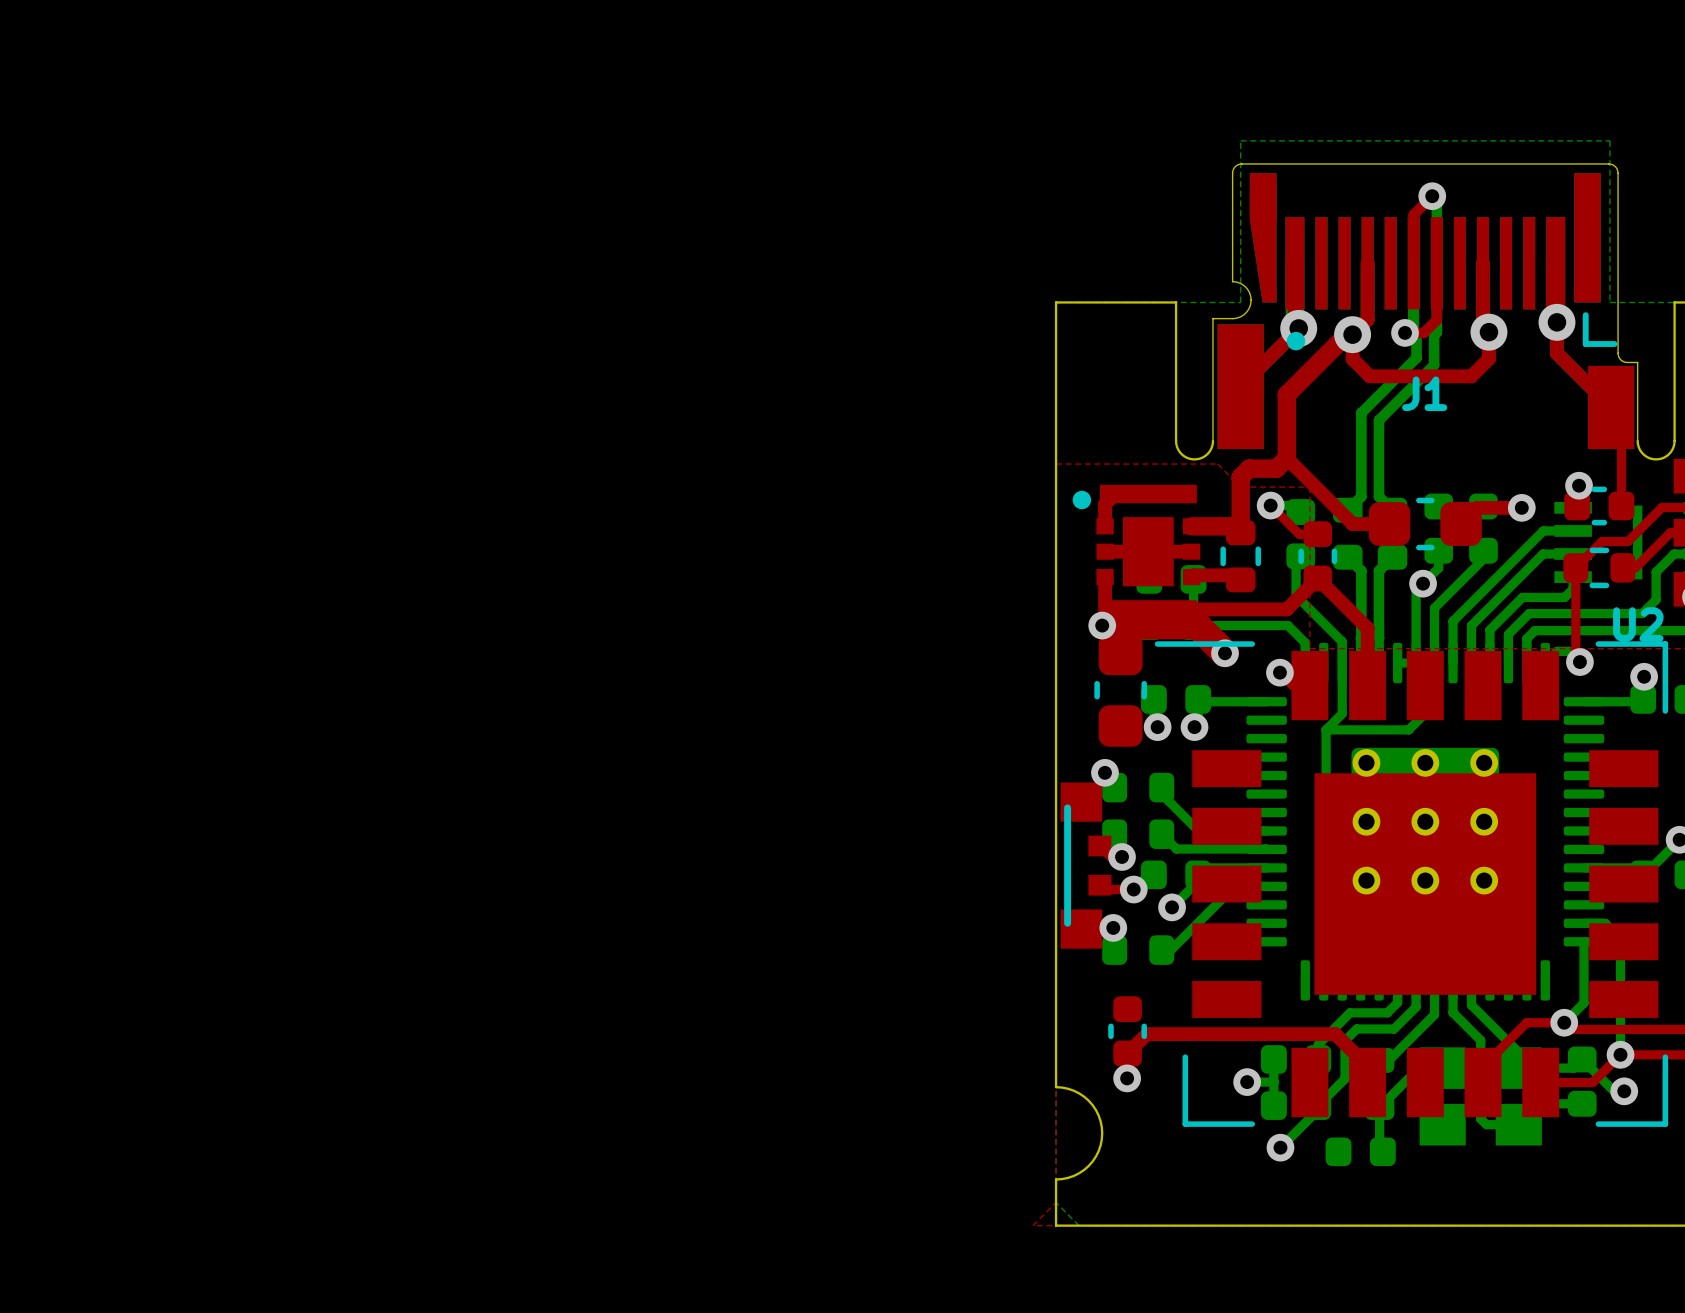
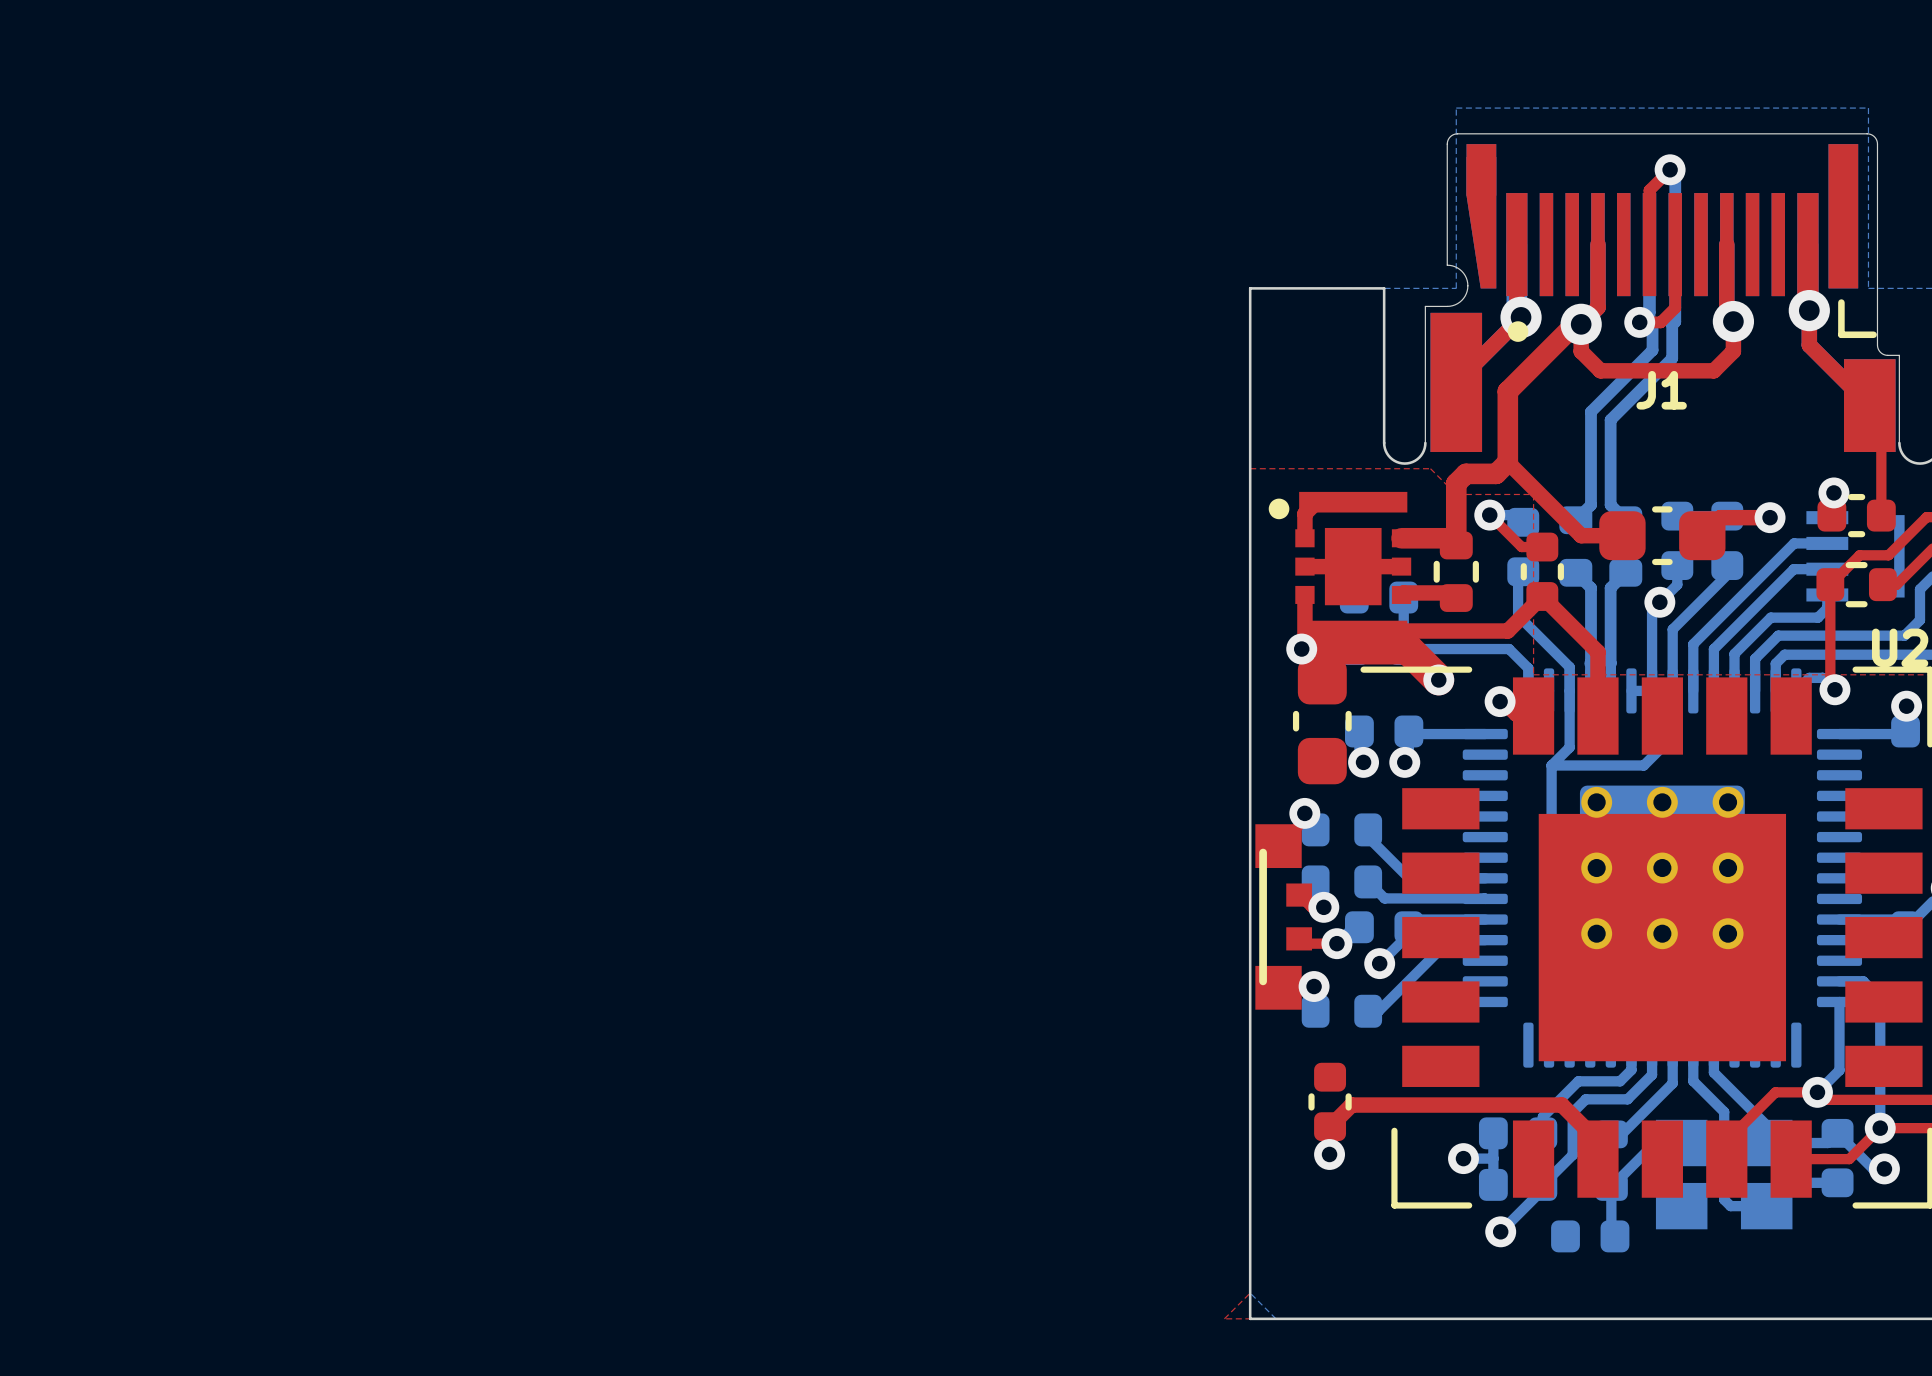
board edge: (1056, 1087) (1073, 1090) (1088, 1100) (1098, 1115) (1102, 1133) (1098, 1150) (1088, 1165) (1073, 1175) (1056, 1179) -> (1250, 1164) (1250, 1267)

